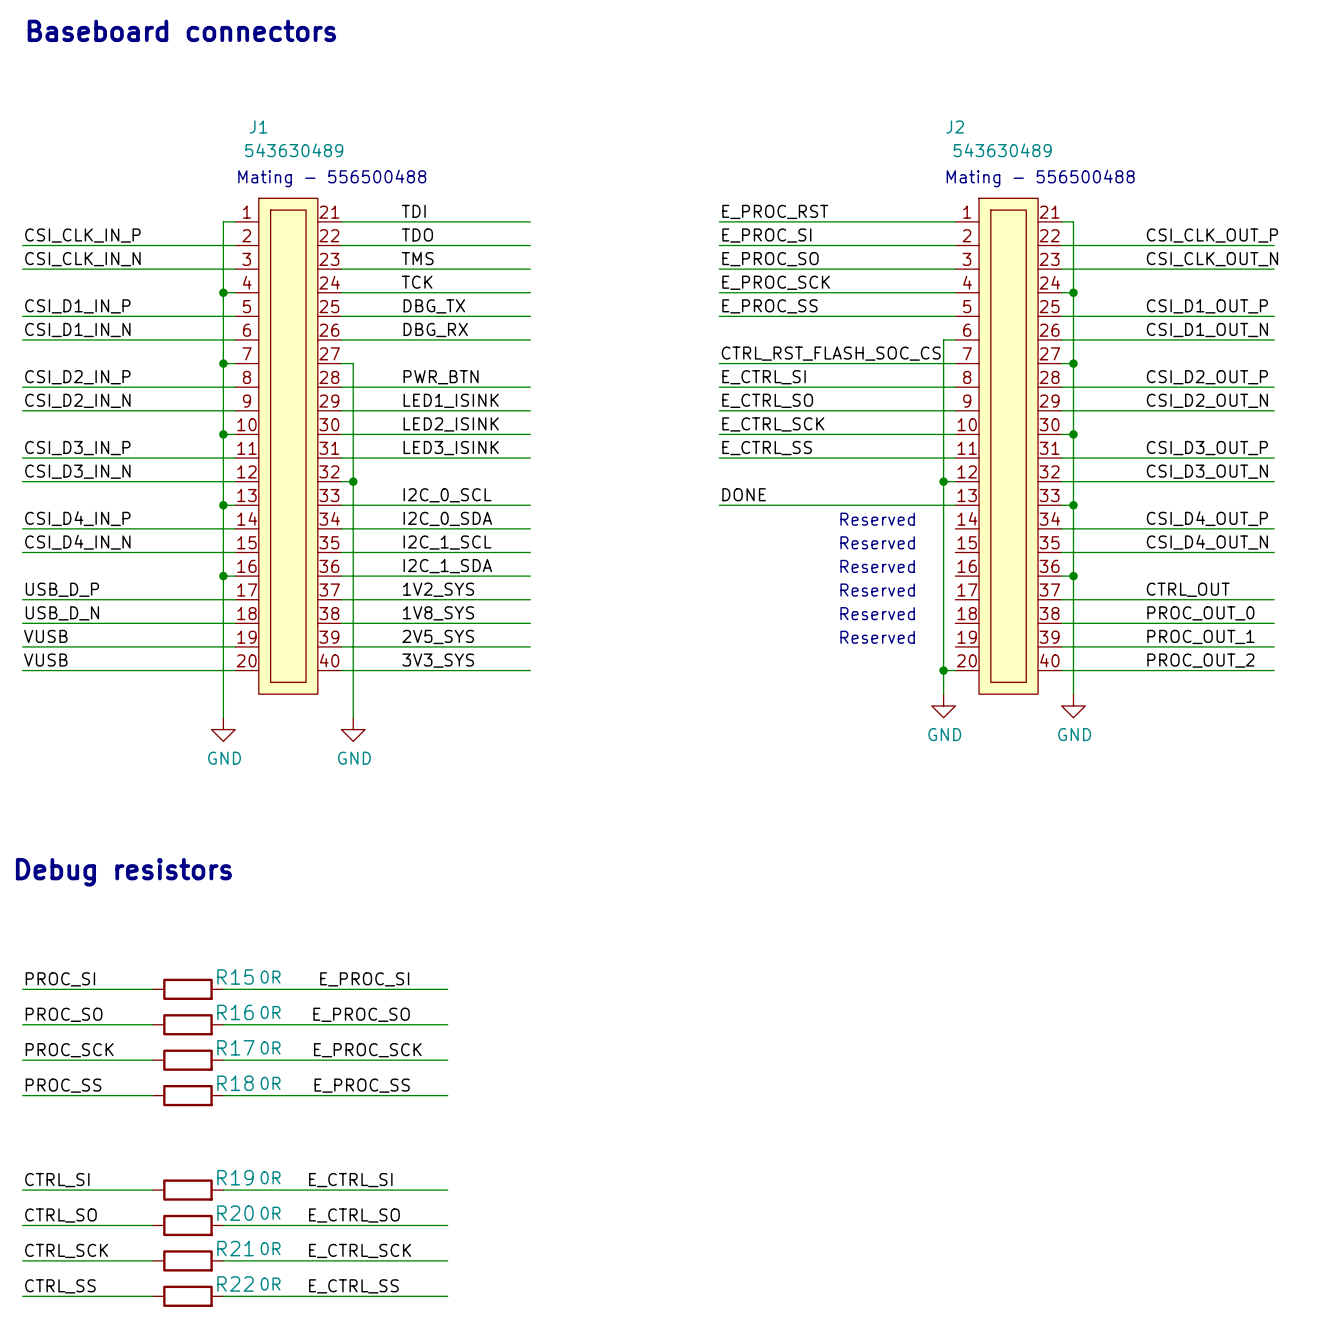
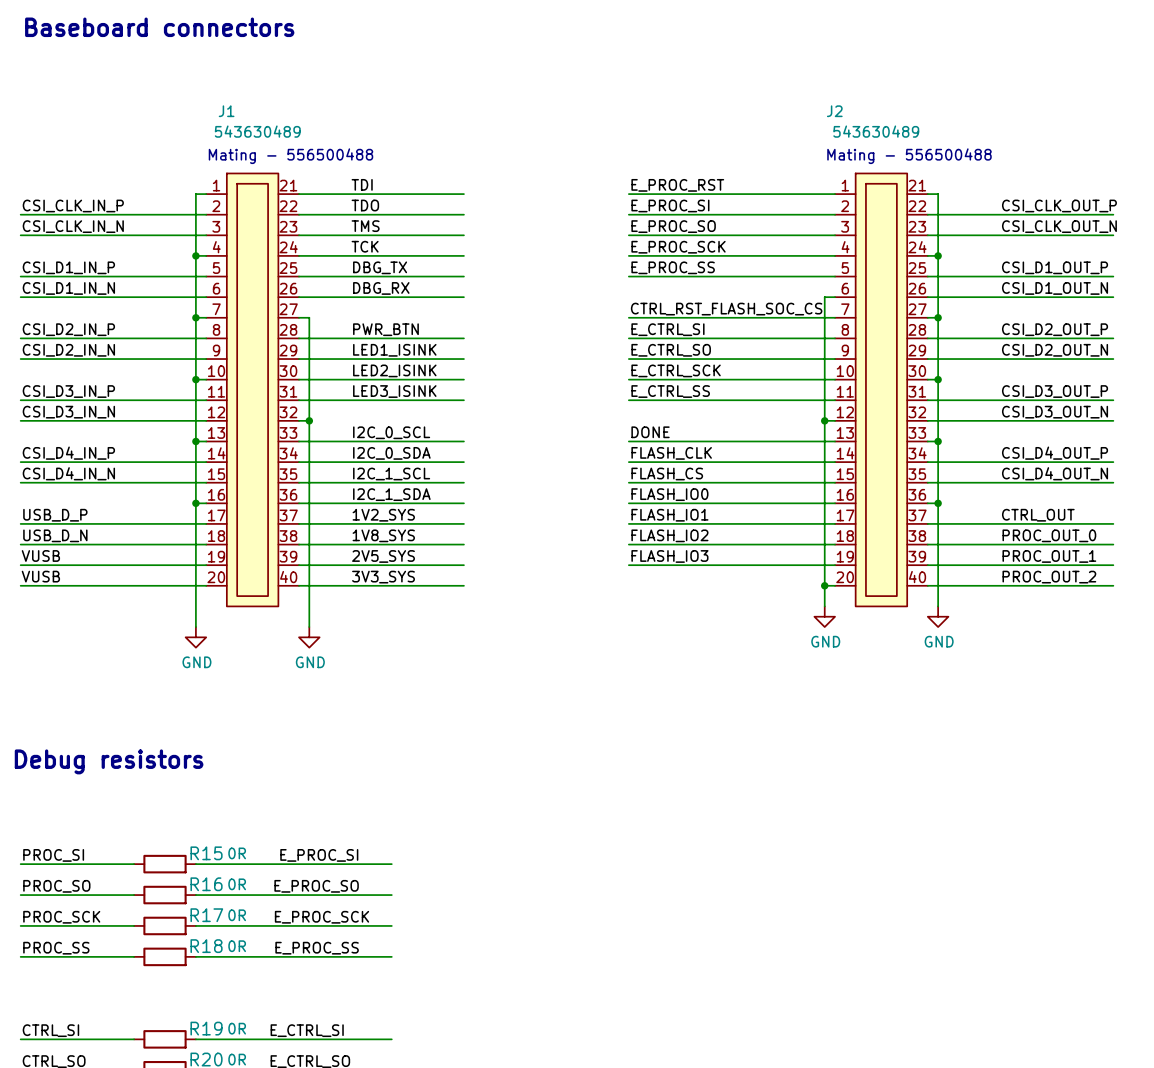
label: none -> FLASH_CLK (671, 453)
text: Reserved (877, 519) -> none
wire: none -> (628, 462) (835, 462)
label: none -> FLASH_CS (667, 474)
text: Reserved (877, 542) -> none
wire: none -> (628, 482) (835, 482)
label: none -> FLASH_IO0 (669, 494)
text: Reserved (877, 566) -> none
wire: none -> (628, 503) (835, 503)
label: none -> FLASH_IO1 (669, 515)
text: Reserved (877, 590) -> none
wire: none -> (628, 523) (835, 523)
label: none -> FLASH_IO2 (669, 535)
text: Reserved (877, 613) -> none
wire: none -> (628, 544) (835, 544)
label: none -> FLASH_IO3 (669, 556)
text: Reserved (877, 637) -> none
wire: none -> (628, 565) (835, 565)

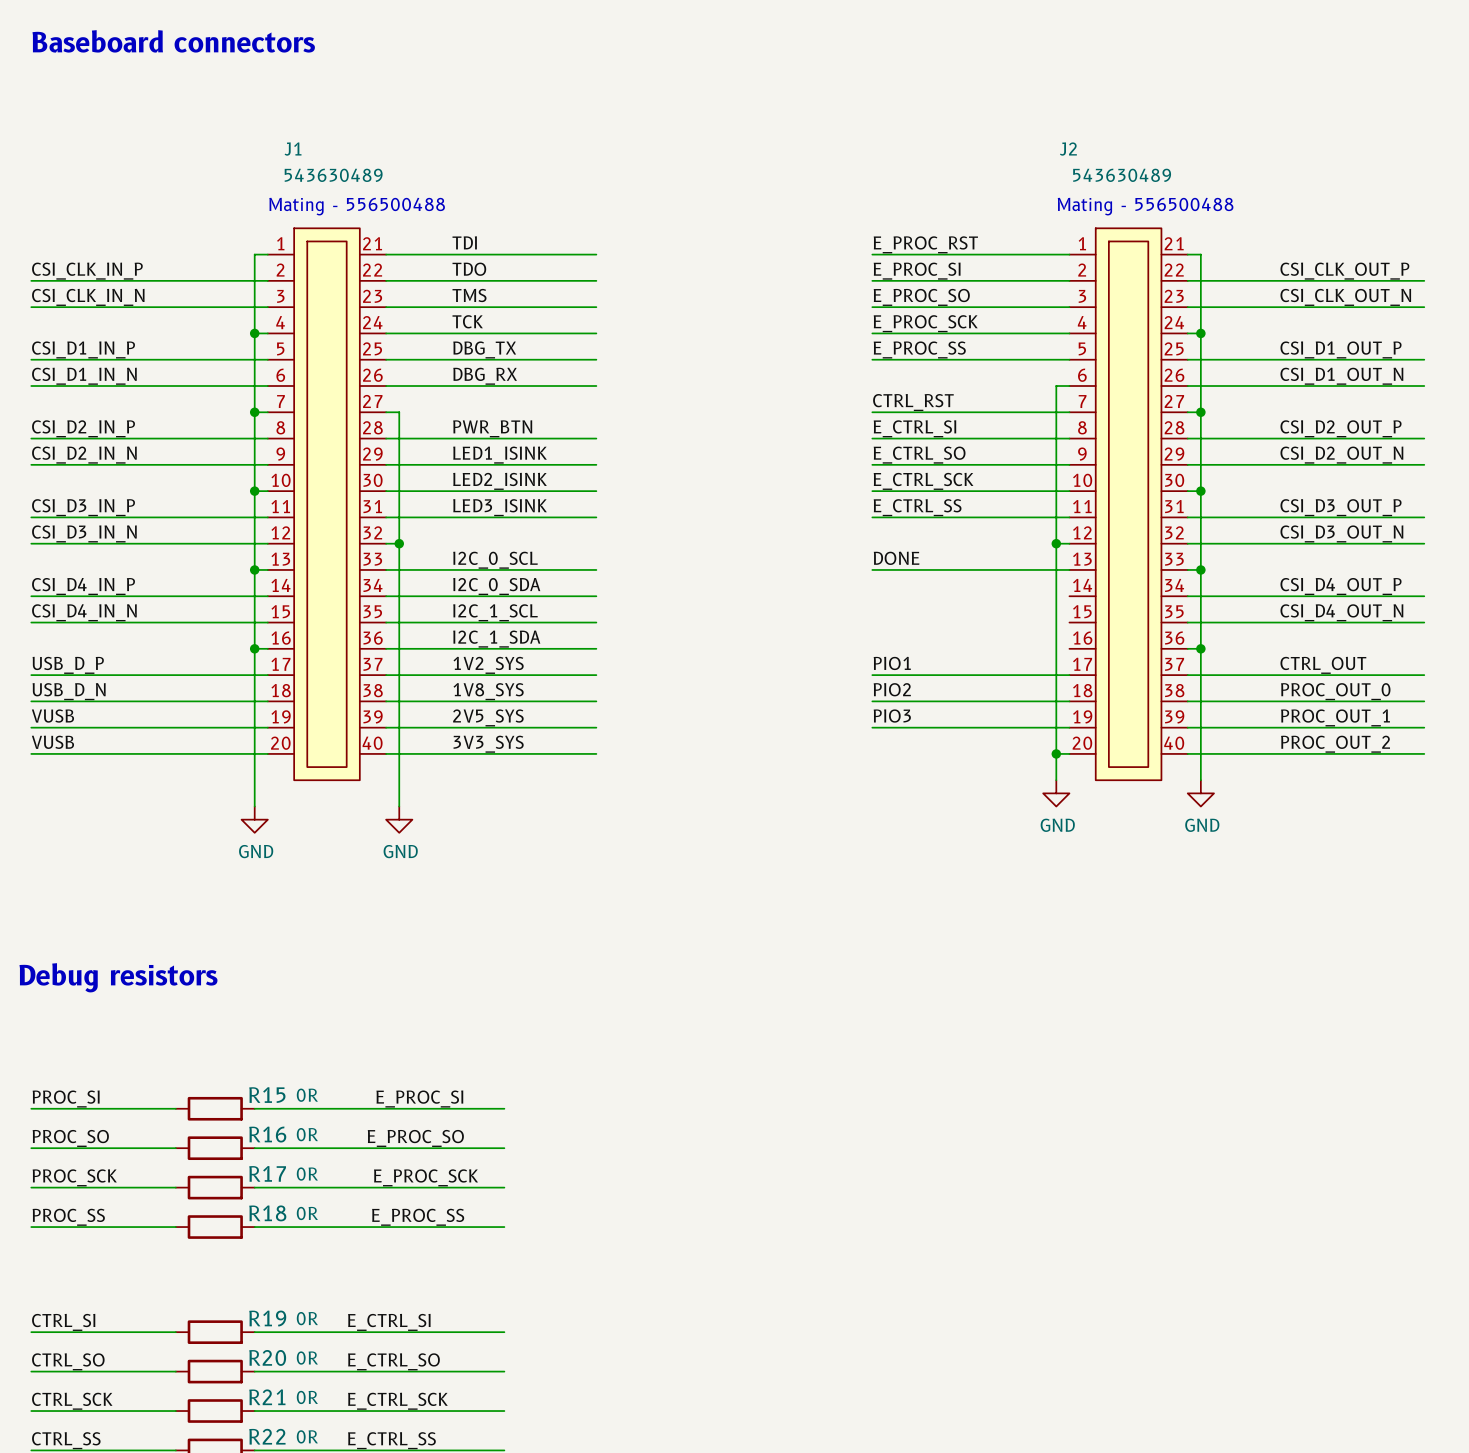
label position: E_PROC_RST (677, 185) -> E_PROC_RST (925, 244)
wire: (628, 194) (680, 194) -> none
label position: E_PROC_SI (670, 205) -> E_PROC_SI (917, 271)
wire: (628, 214) (680, 214) -> none
label position: E_PROC_SO (673, 226) -> E_PROC_SO (921, 297)
wire: (628, 235) (680, 235) -> none
label position: E_PROC_SCK (678, 247) -> E_PROC_SCK (925, 323)
wire: (628, 255) (680, 255) -> none
label position: E_PROC_SS (673, 267) -> E_PROC_SS (919, 349)
wire: (628, 276) (680, 276) -> none
label: none -> CTRL_RST (913, 402)
label: CTRL_RST_FLASH_SOC_CS (726, 309) -> none
wire: (628, 317) (680, 317) -> none
label position: E_CTRL_SI (667, 329) -> E_CTRL_SI (914, 428)
wire: (628, 338) (680, 338) -> none
label position: E_CTRL_SO (671, 350) -> E_CTRL_SO (919, 455)
wire: (628, 359) (680, 359) -> none
label position: E_CTRL_SCK (676, 370) -> E_CTRL_SCK (923, 481)
wire: (628, 379) (680, 379) -> none
label position: E_CTRL_SS (670, 391) -> E_CTRL_SS (917, 507)
wire: (628, 400) (680, 400) -> none
label position: DONE (650, 432) -> DONE (896, 558)
wire: (628, 441) (680, 441) -> none
label: FLASH_CLK (671, 453) -> none
wire: (628, 462) (835, 462) -> none
label: FLASH_CS (667, 474) -> none
wire: (628, 482) (835, 482) -> none
label: FLASH_IO0 (669, 494) -> none
wire: (628, 503) (835, 503) -> none
label: none -> PIO1 (892, 663)
label: FLASH_IO1 (669, 515) -> none
wire: (628, 523) (680, 523) -> none
label: FLASH_IO2 (669, 535) -> none
label: none -> PIO2 (892, 689)
wire: (628, 544) (680, 544) -> none
label: none -> PIO3 (892, 716)
label: FLASH_IO3 (669, 556) -> none
wire: (628, 565) (680, 565) -> none

